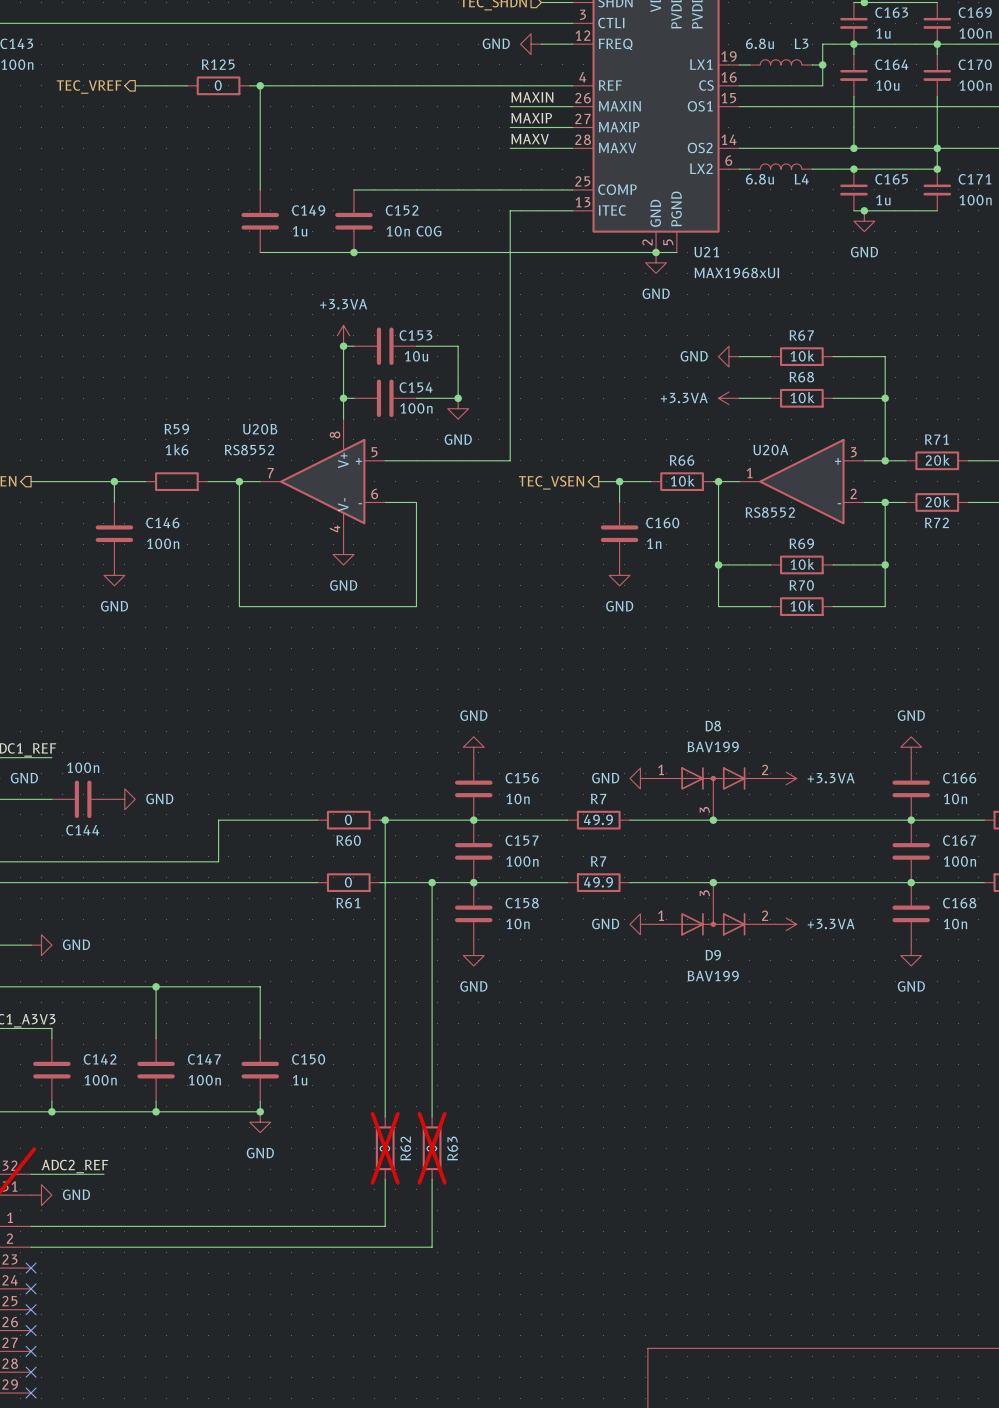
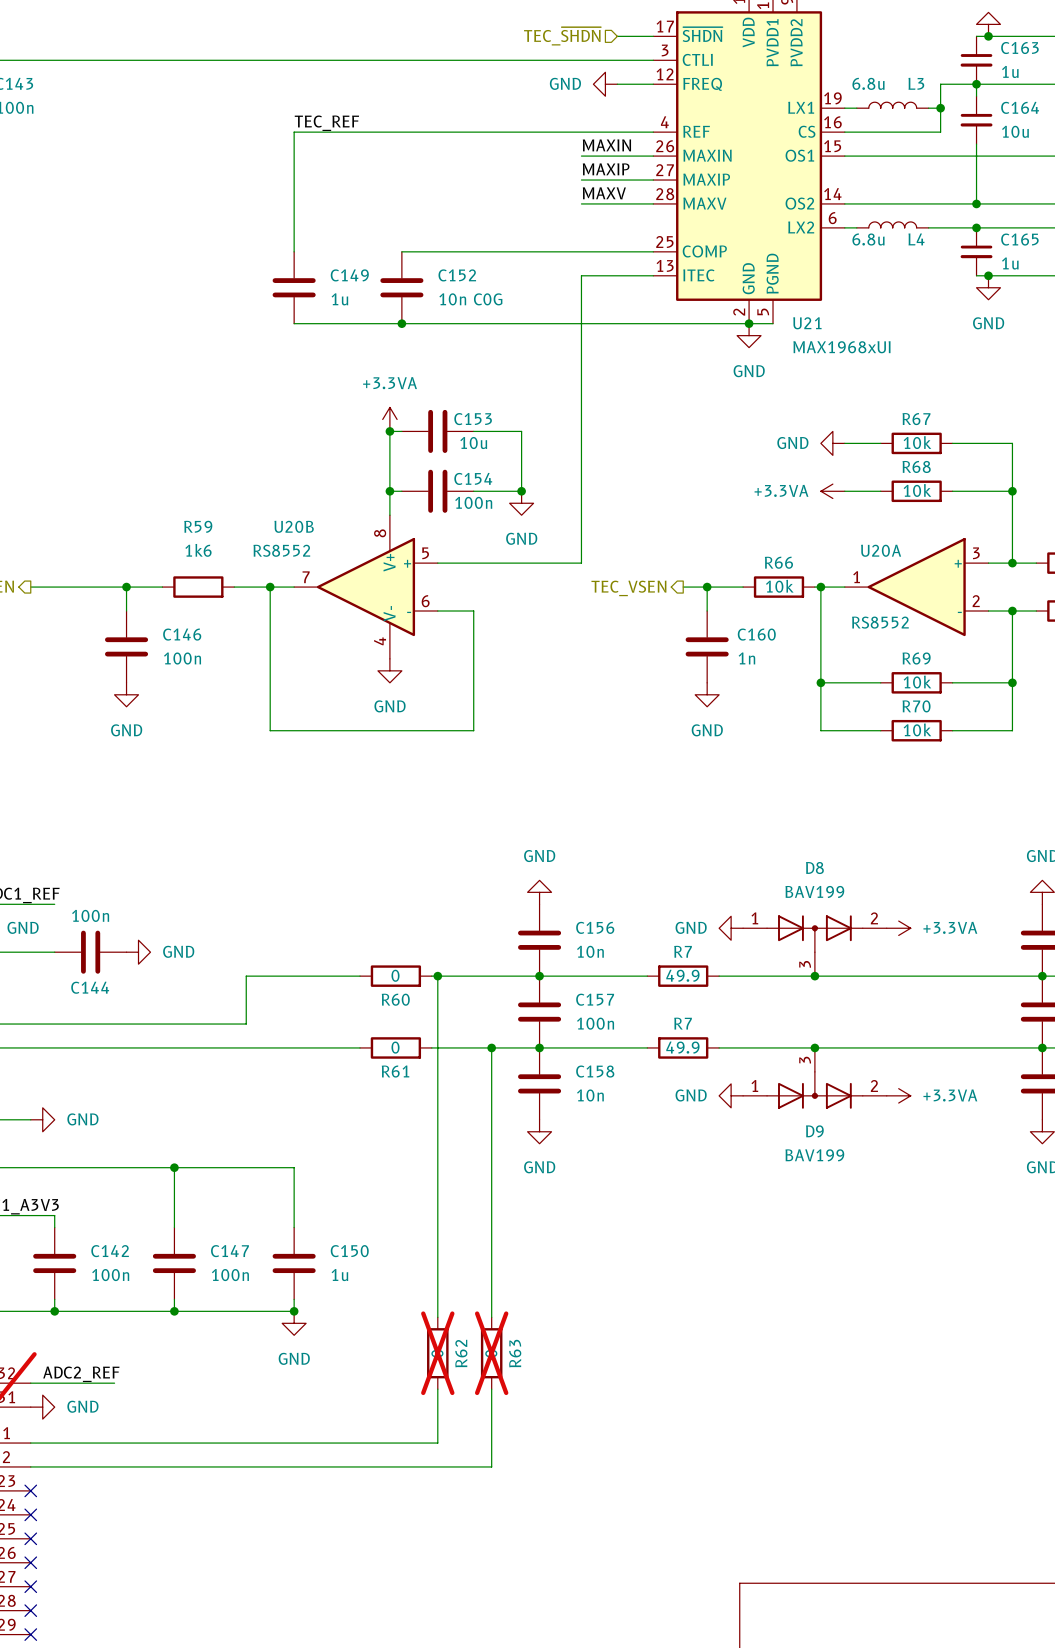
label: none -> TEC_REF (326, 123)
wire: (135, 85) (187, 85) -> none
R125: 0 (218, 85) -> none
wire: (249, 85) (260, 85) -> none
junction: (260, 85) -> none
hierarchical label: TEC_VREF (89, 86) -> none

